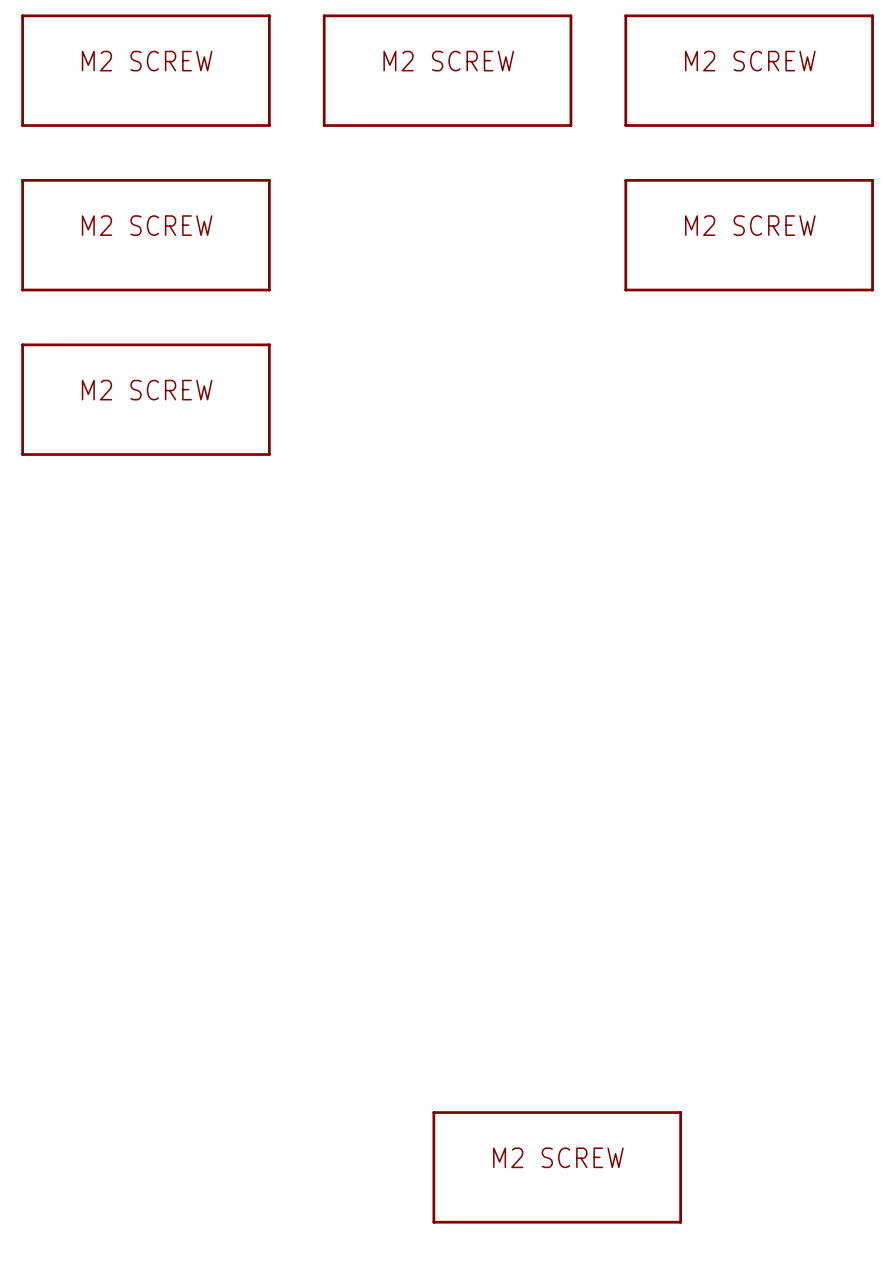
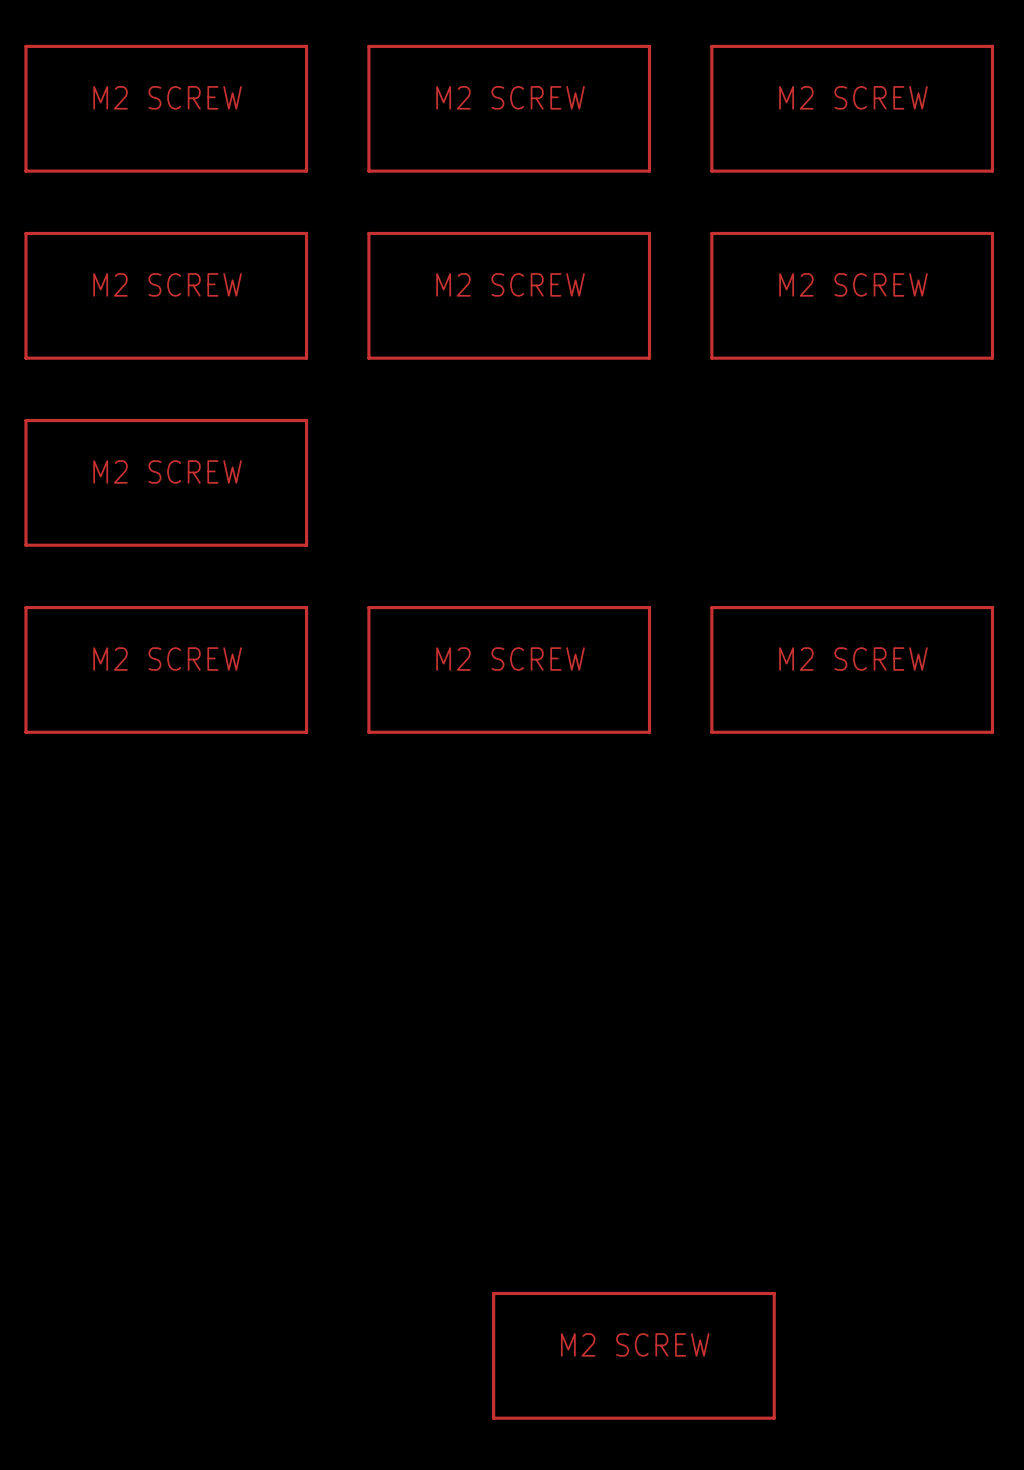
part: none -> (509, 295)
part: none -> (166, 669)
part: none -> (509, 669)
part: none -> (852, 669)

